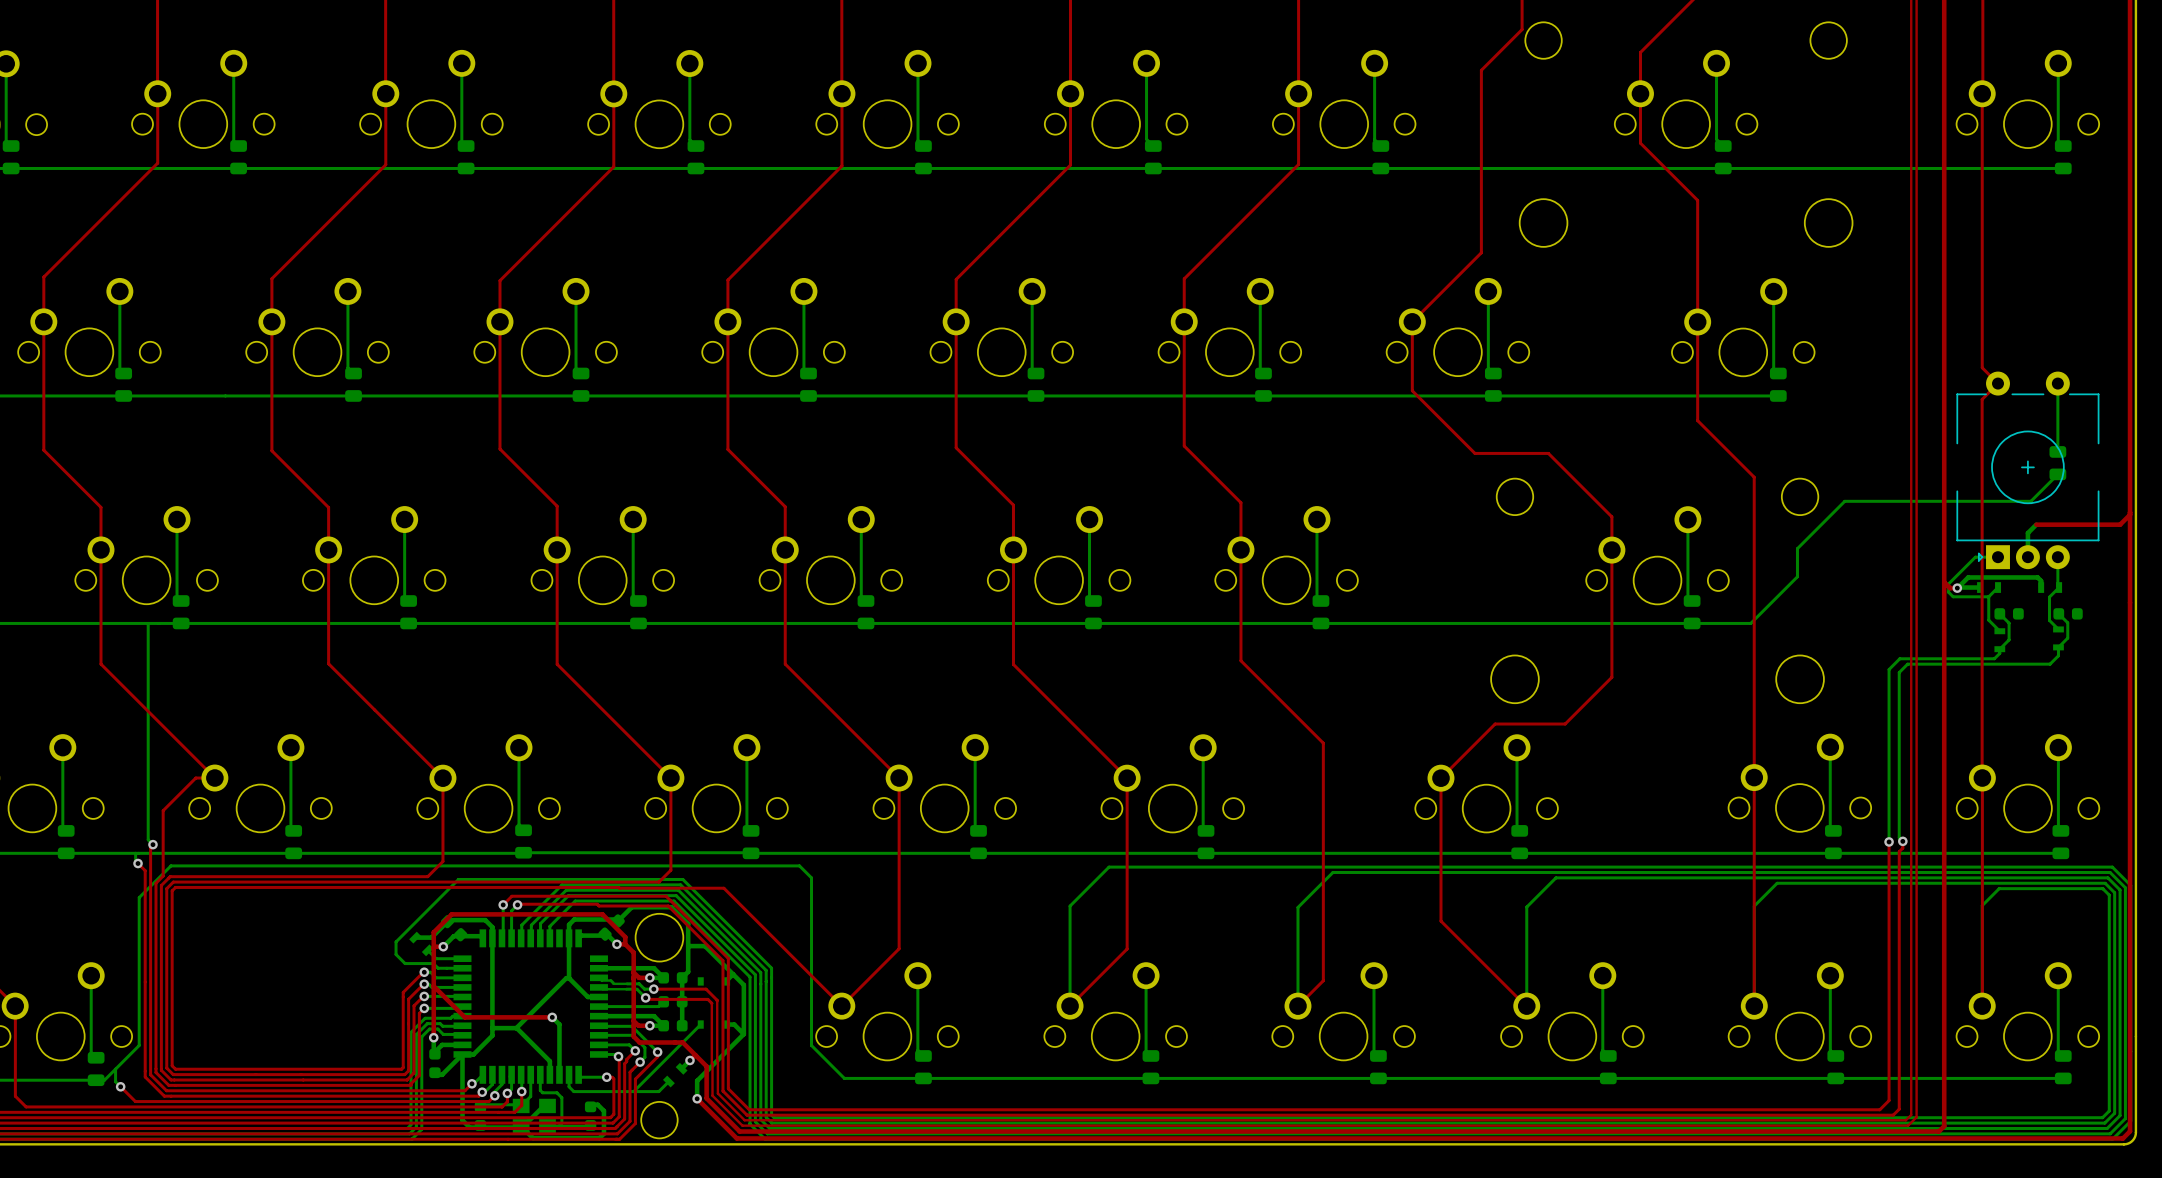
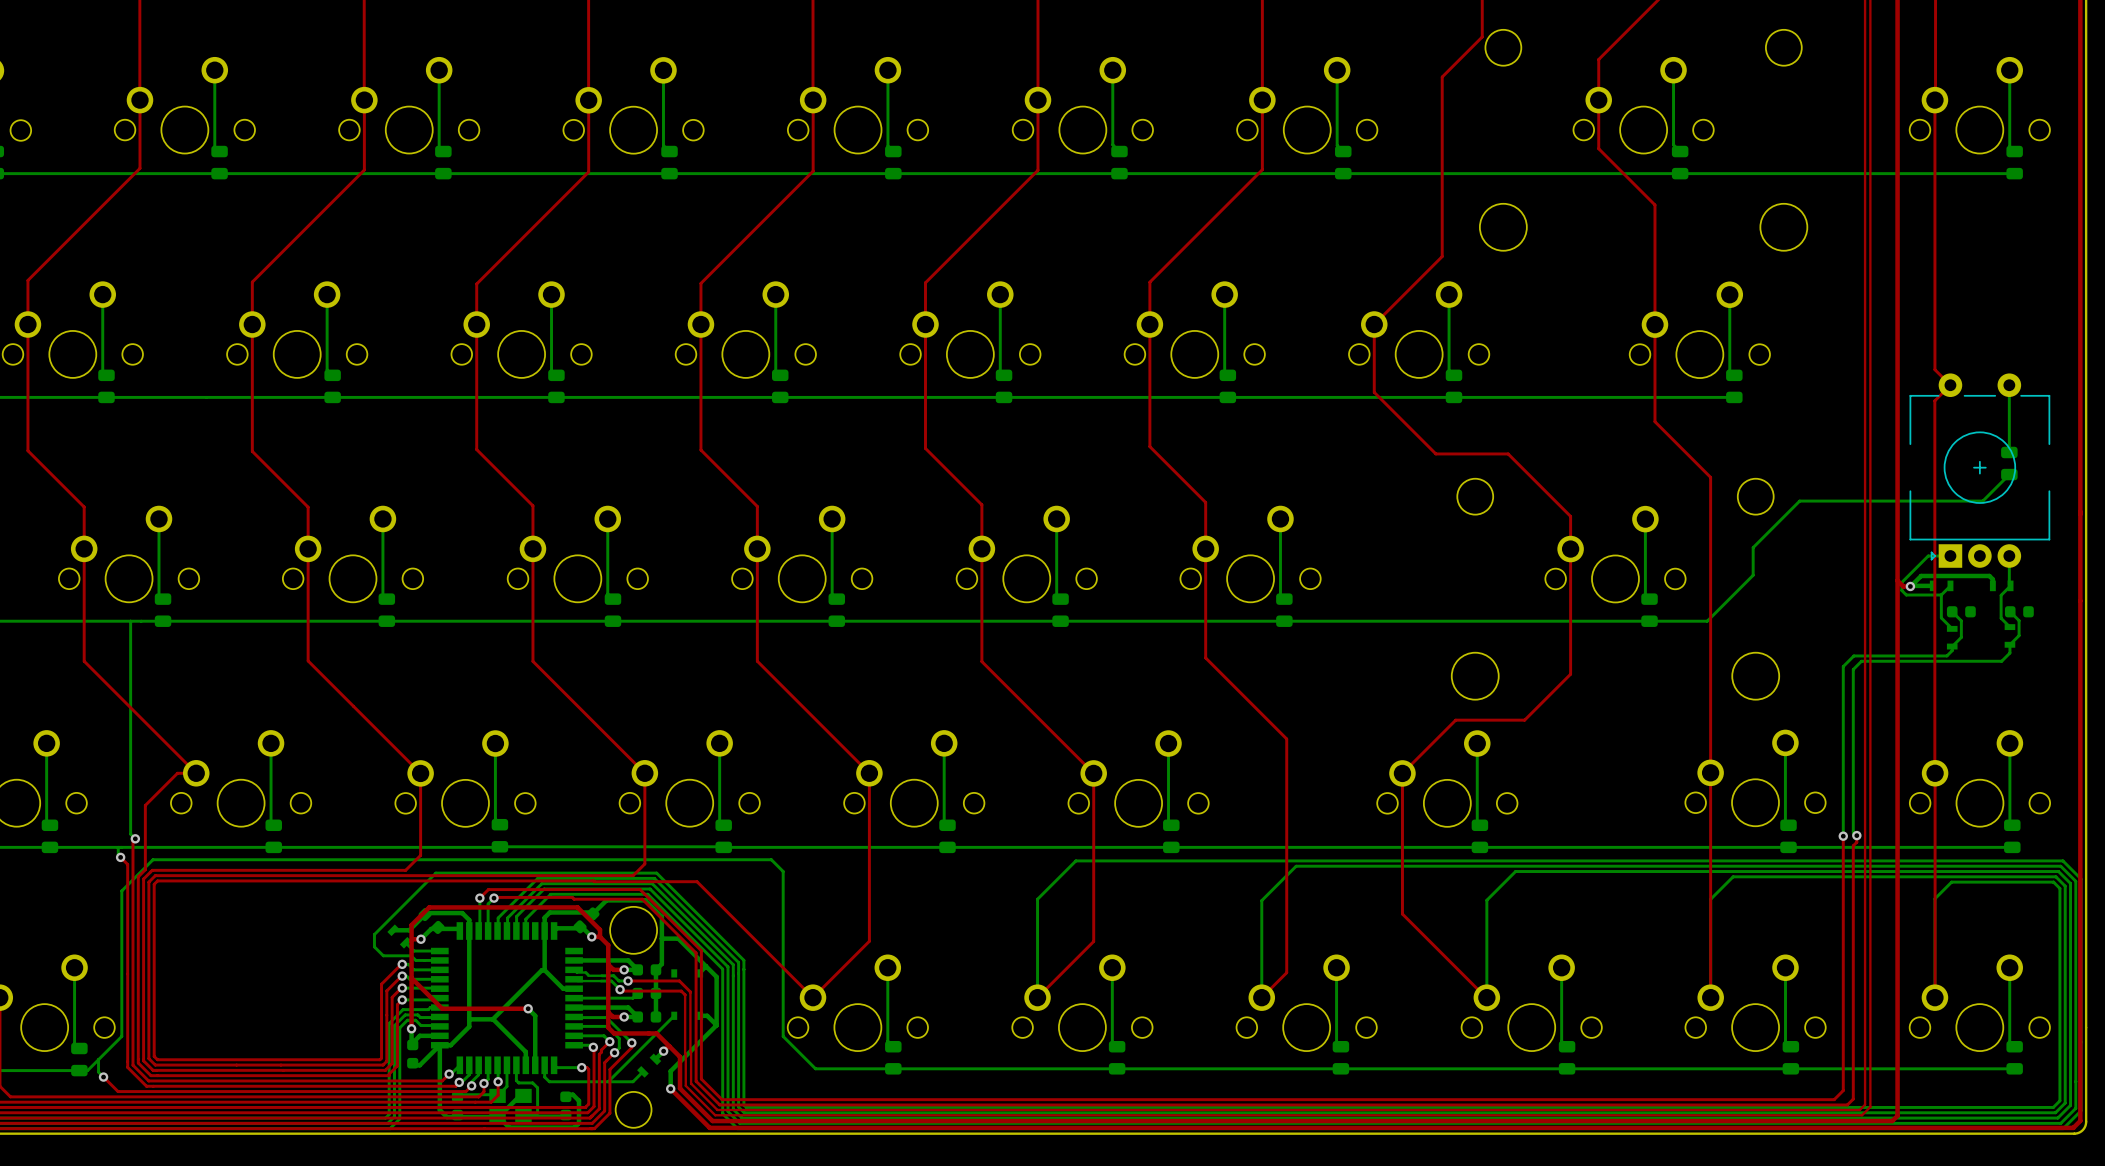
top track: (2130, 514) (2120, 524) (2036, 524) -> none
bottom track: (2036, 524) (2027, 533) (2027, 557) -> none

